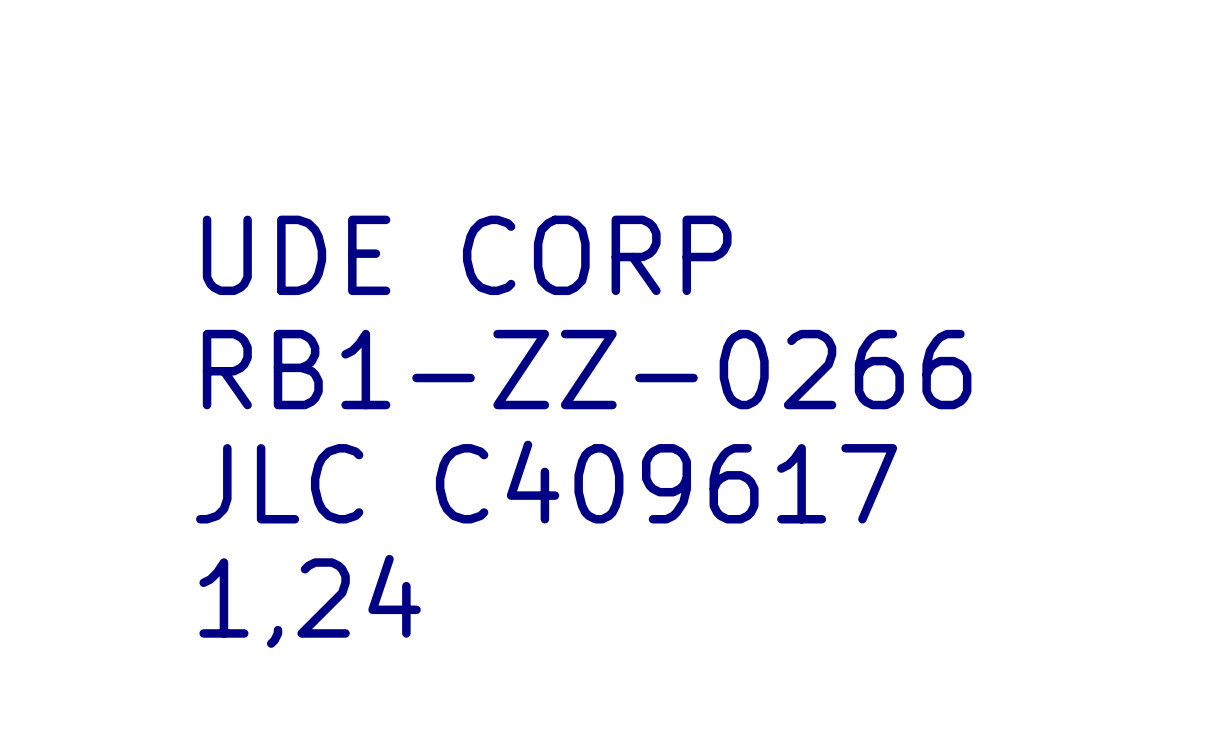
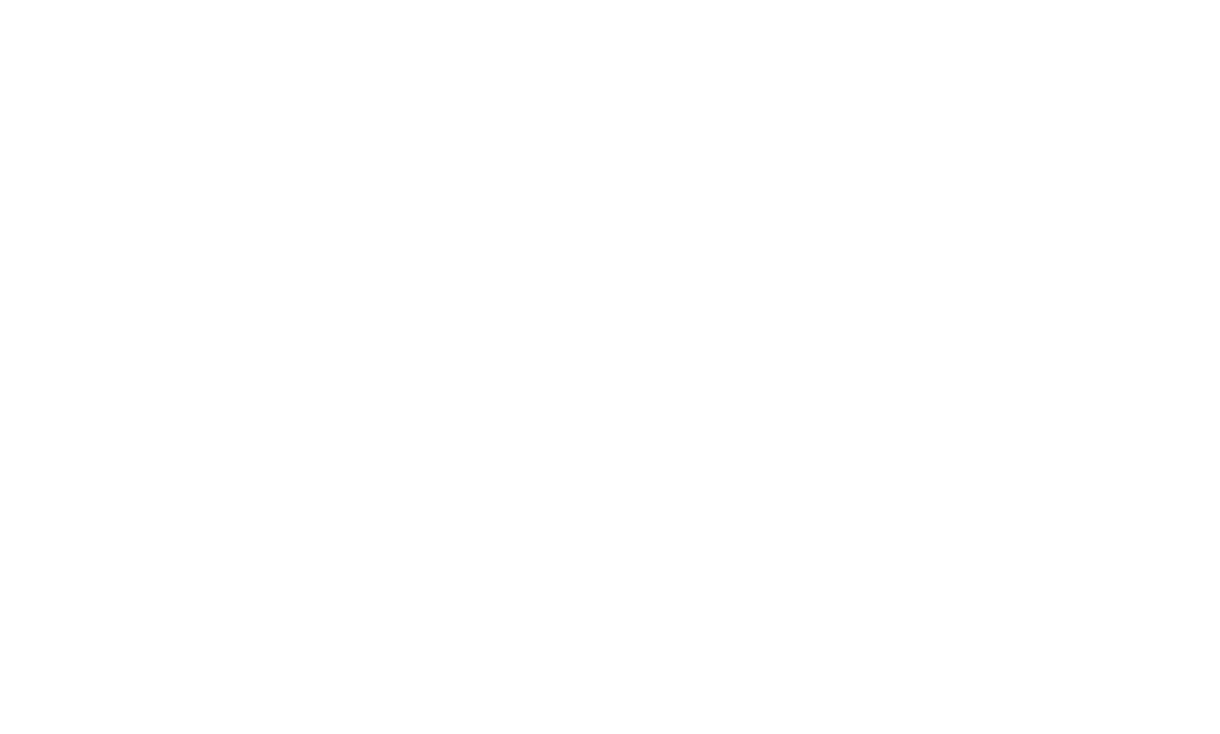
text: UDE CORP (467, 255) -> none
text: RB1-ZZ-0266 (587, 369) -> none
text: JLC C409617 (546, 482) -> none
text: 1,24 (310, 601) -> none

